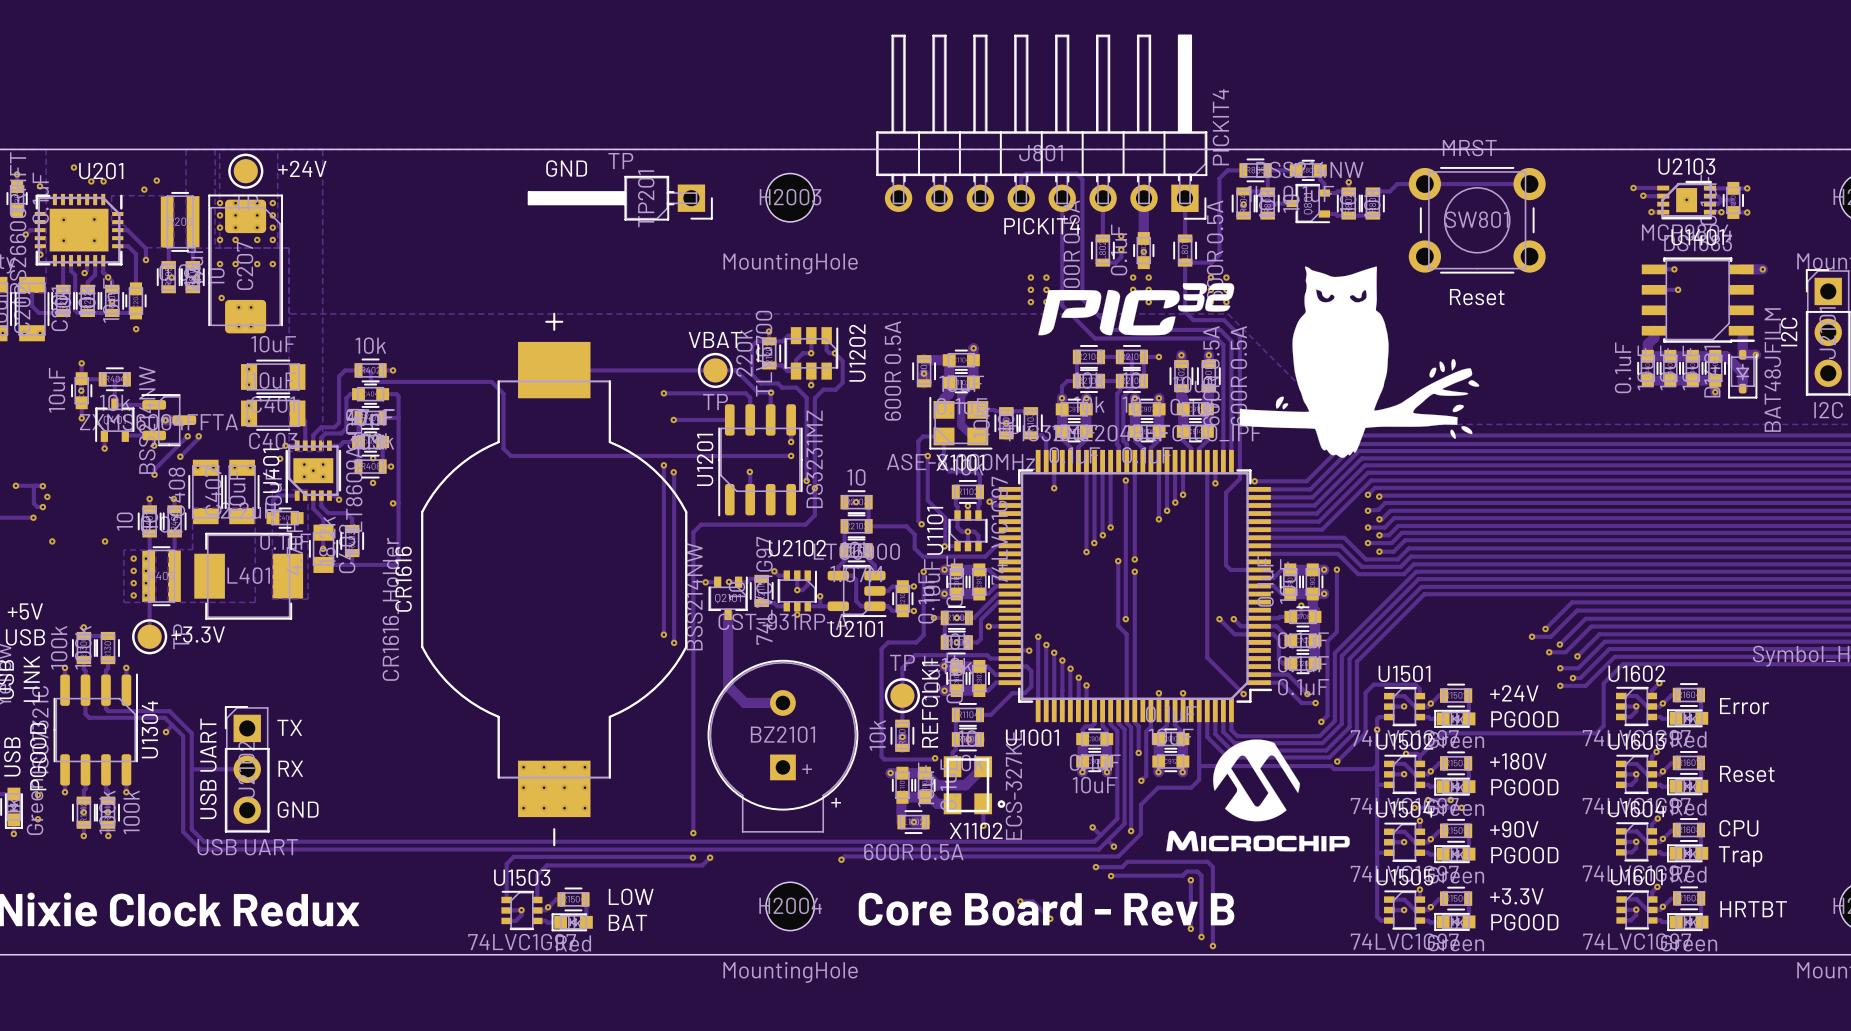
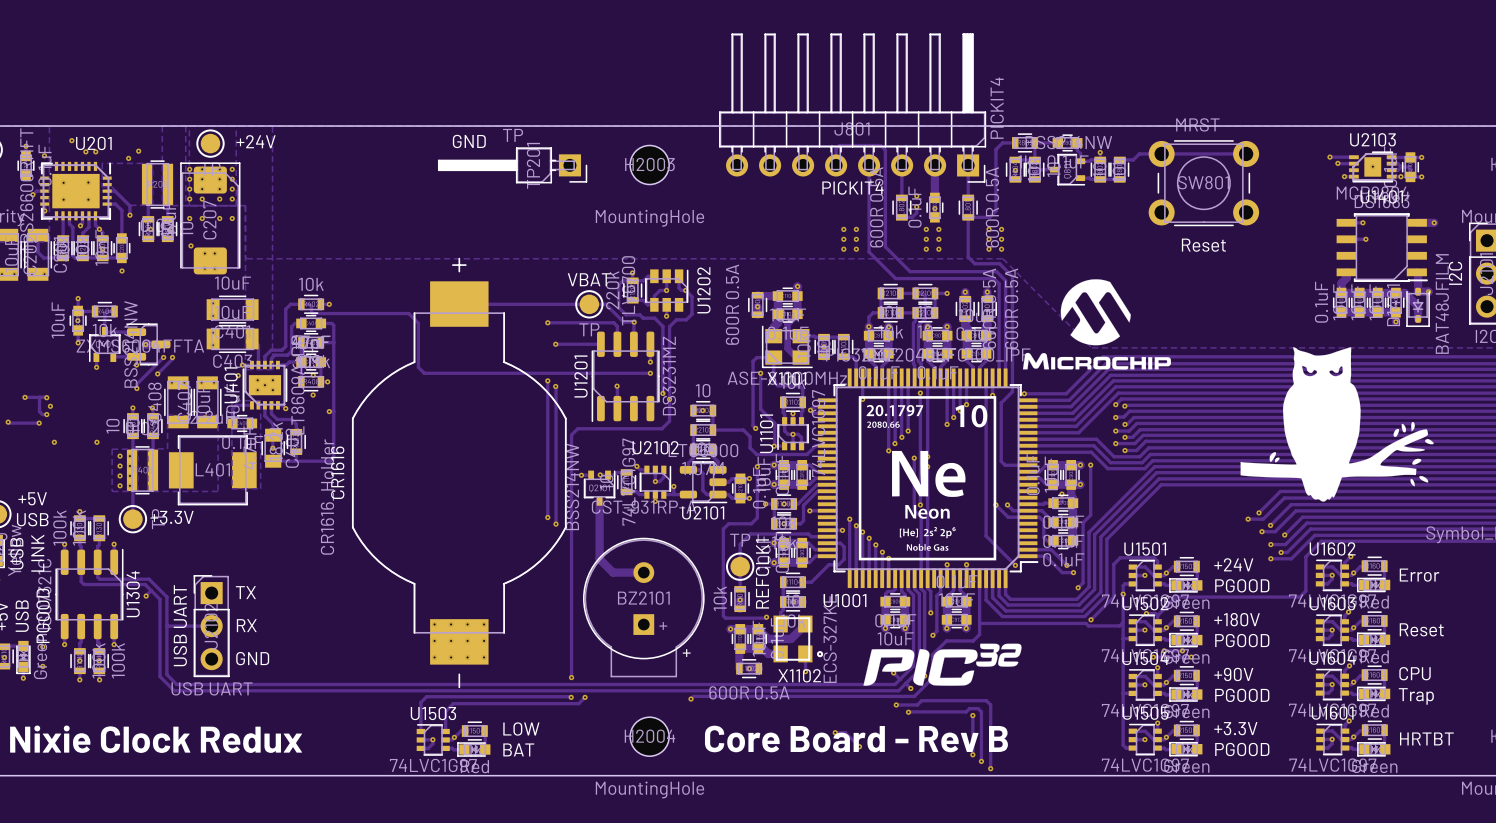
drawing: [1038, 283, 1235, 336] -> none
drawing: none -> [1022, 279, 1171, 370]
drawing position: (1359, 362) -> (1337, 424)
drawing: none -> [858, 396, 997, 561]
drawing: [1166, 739, 1350, 852] -> none
drawing: none -> [863, 643, 1022, 686]

